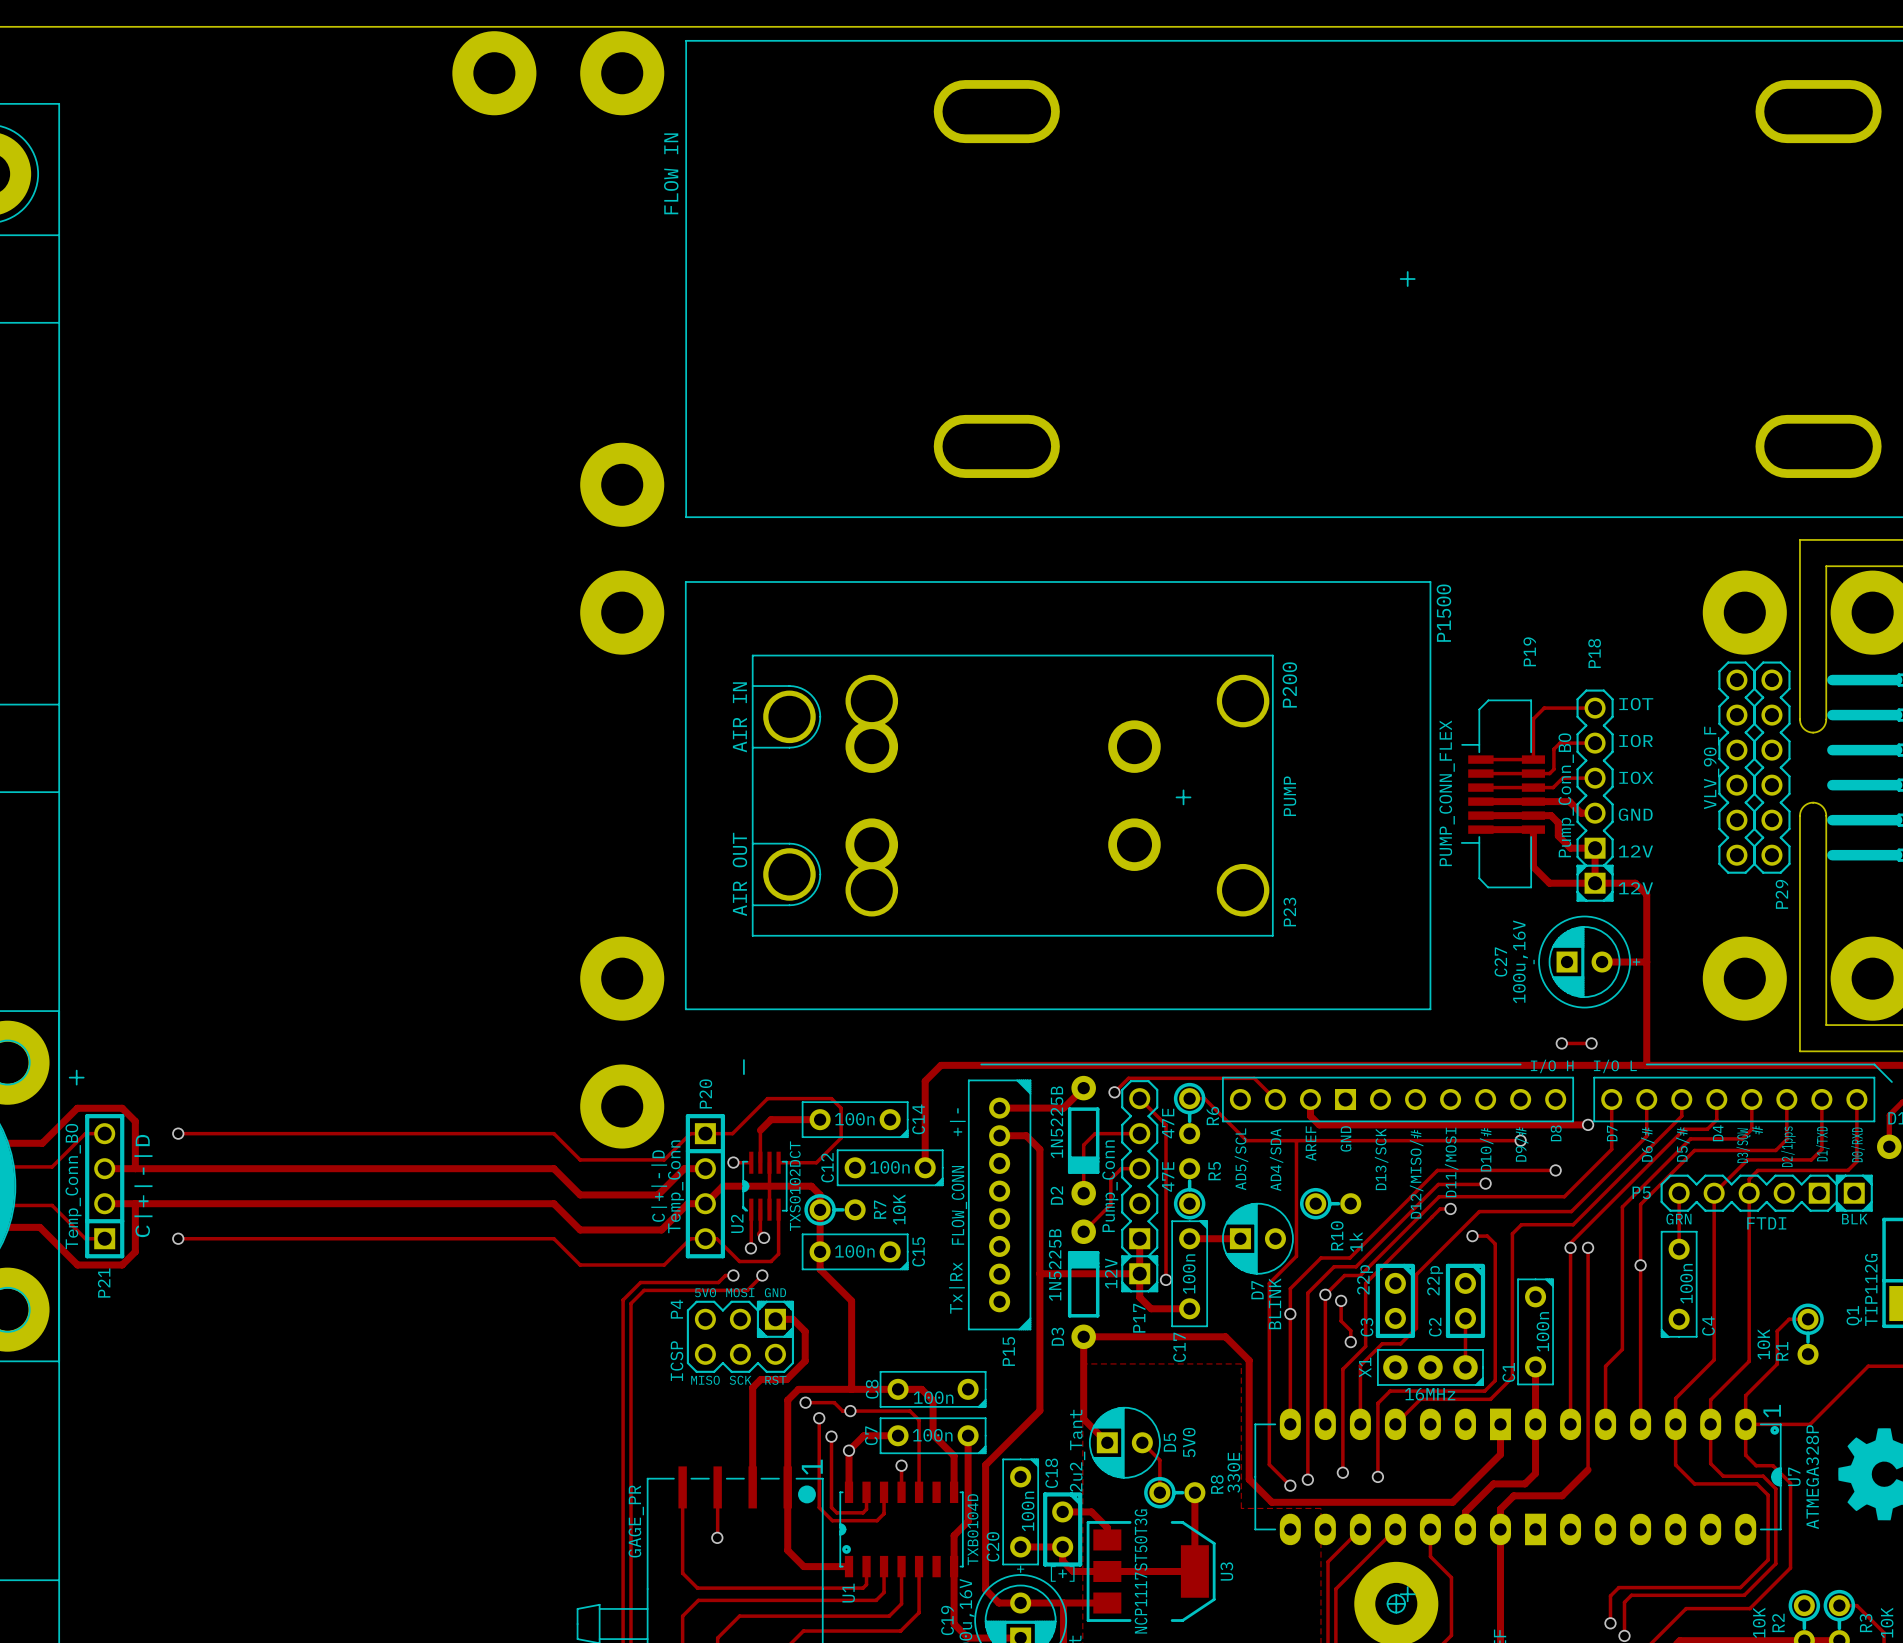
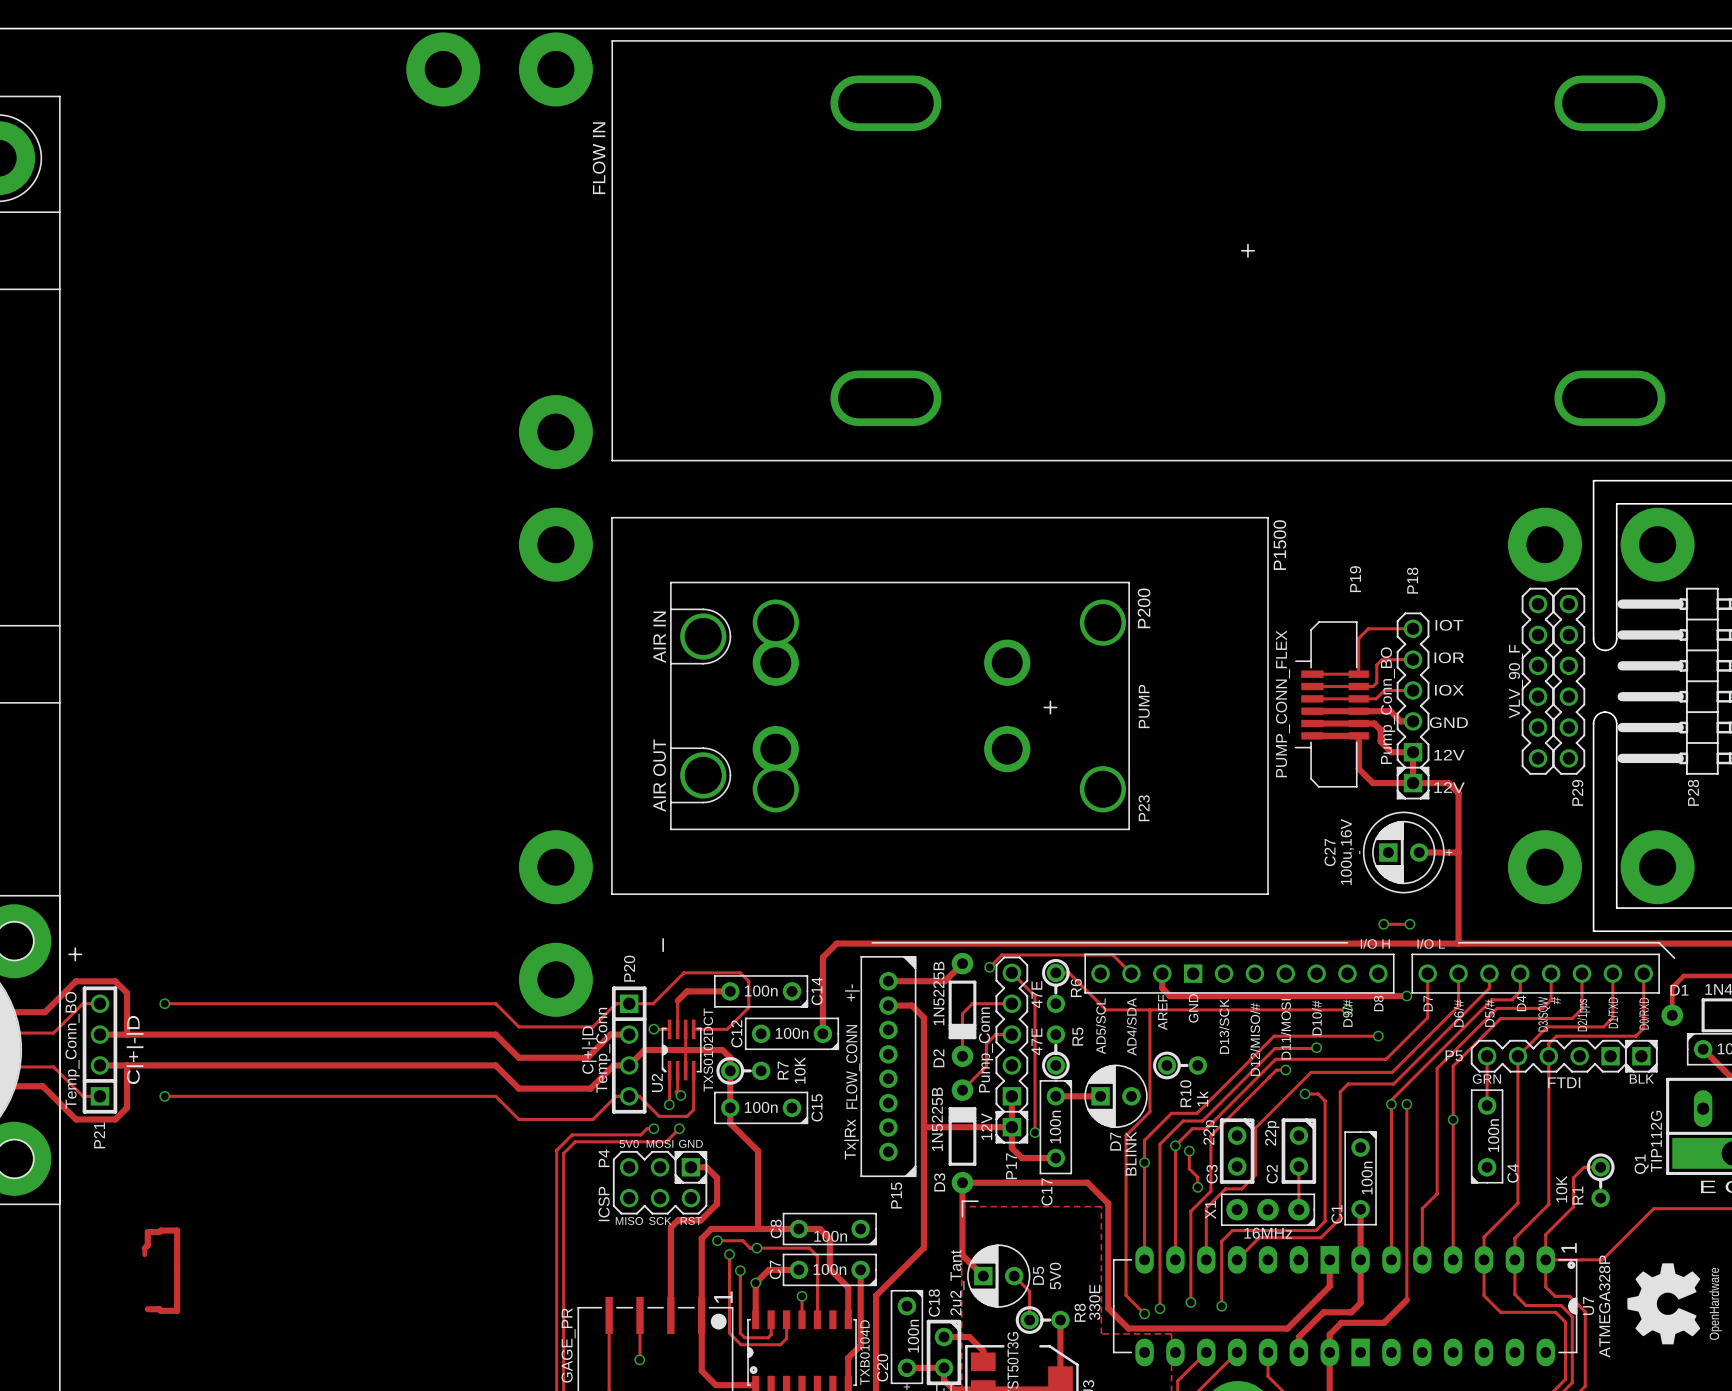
line: none -> (977, 1201) (962, 1201) (962, 1216)
track: none -> (144, 1254) (144, 1248) (147, 1245) (147, 1232) (177, 1230) (177, 1310) (147, 1309)

